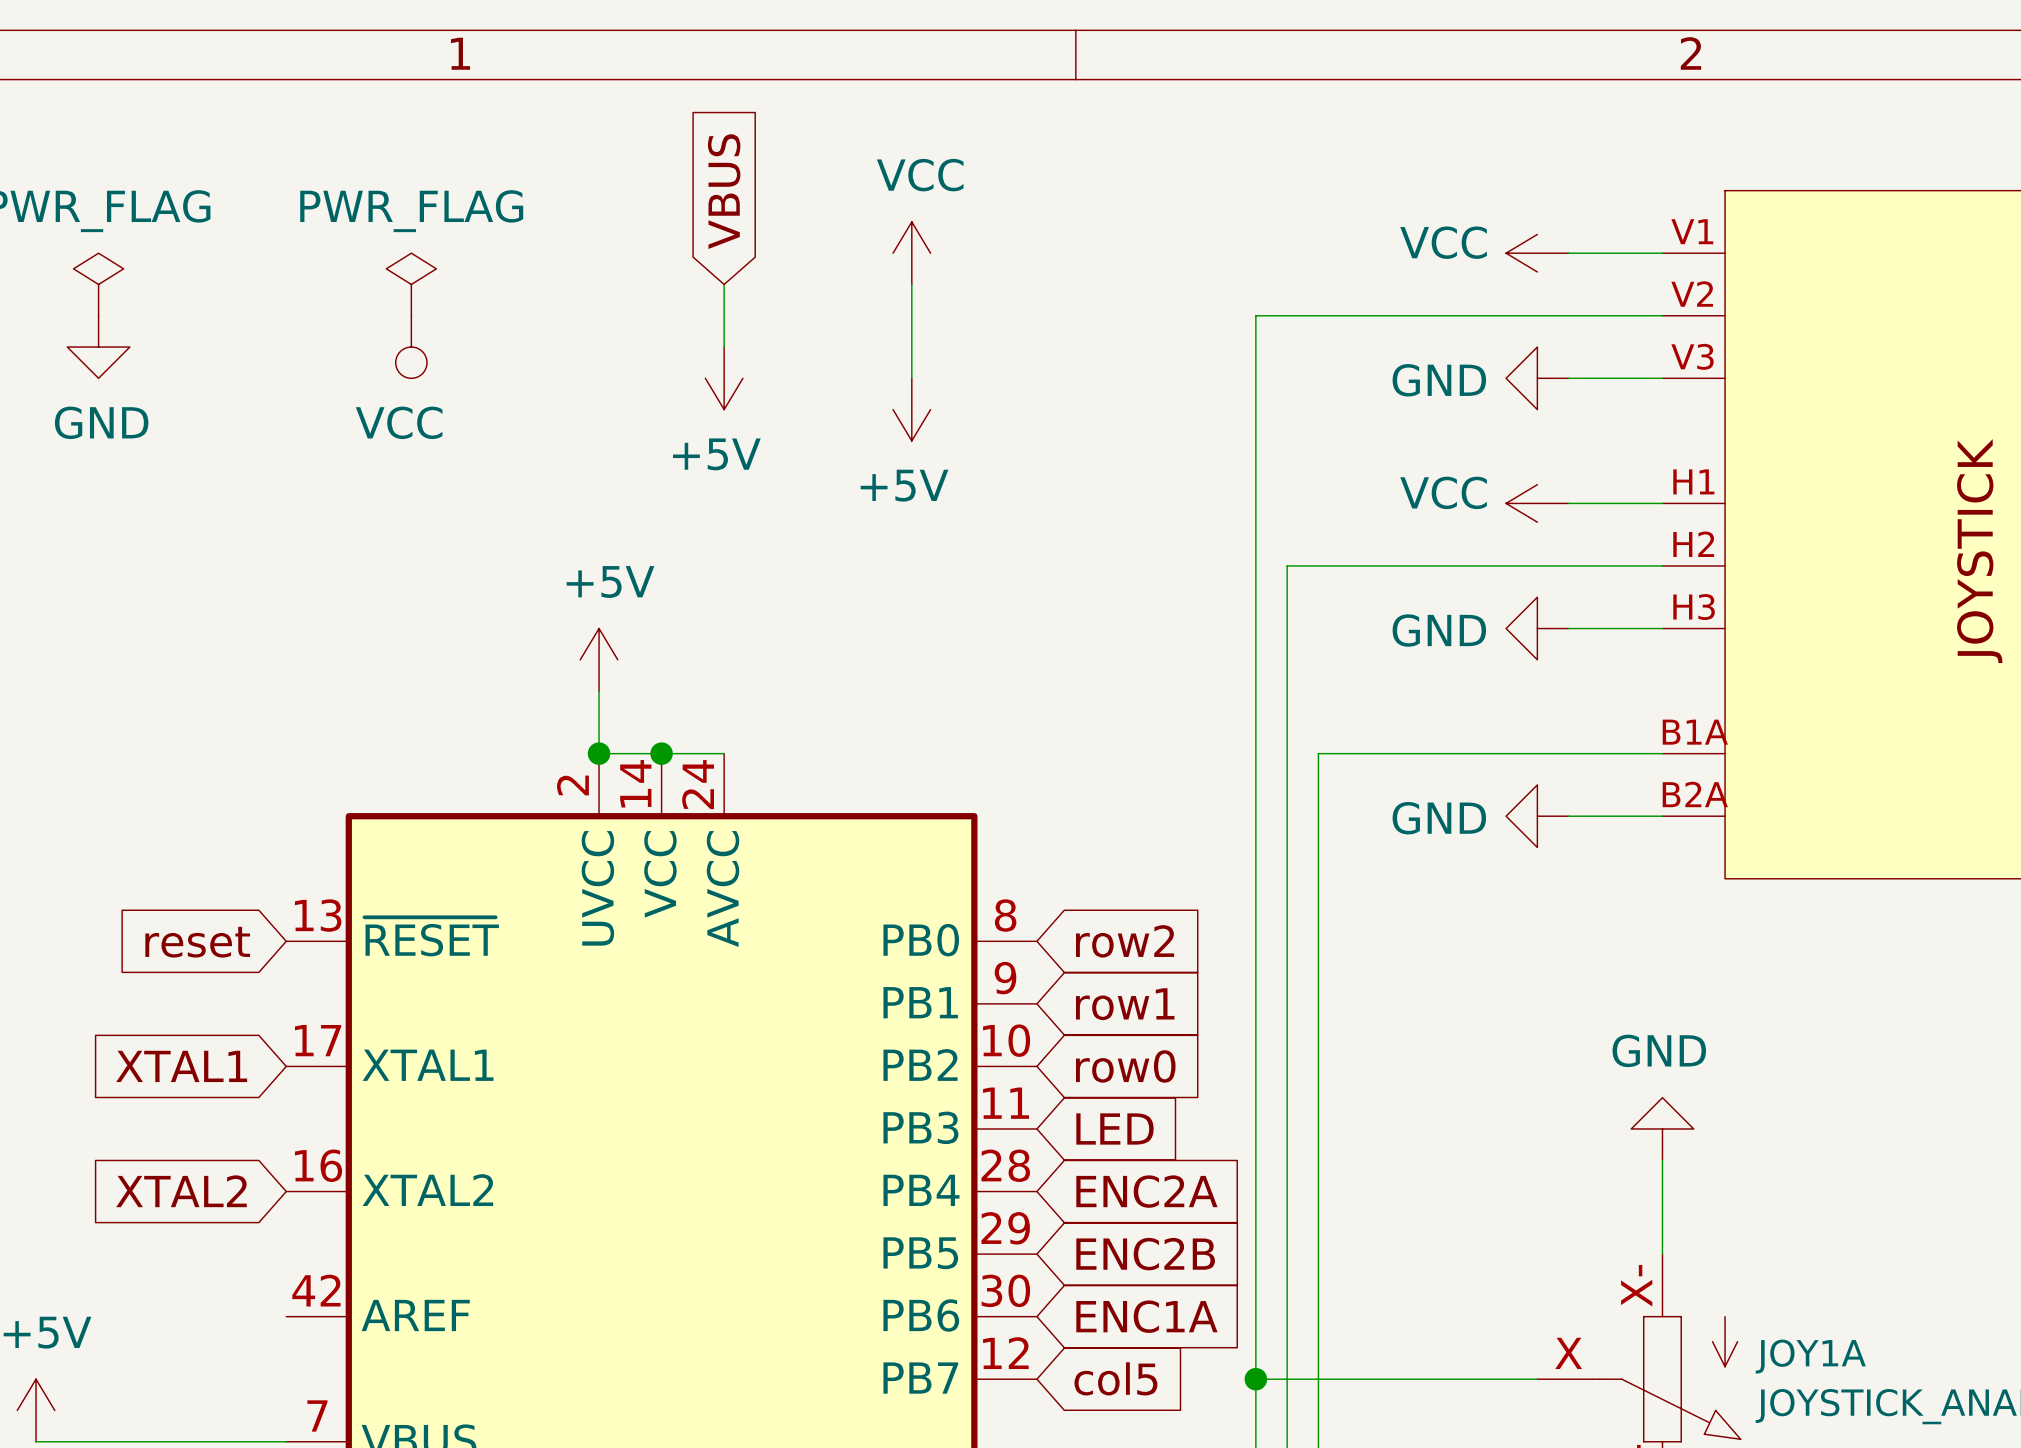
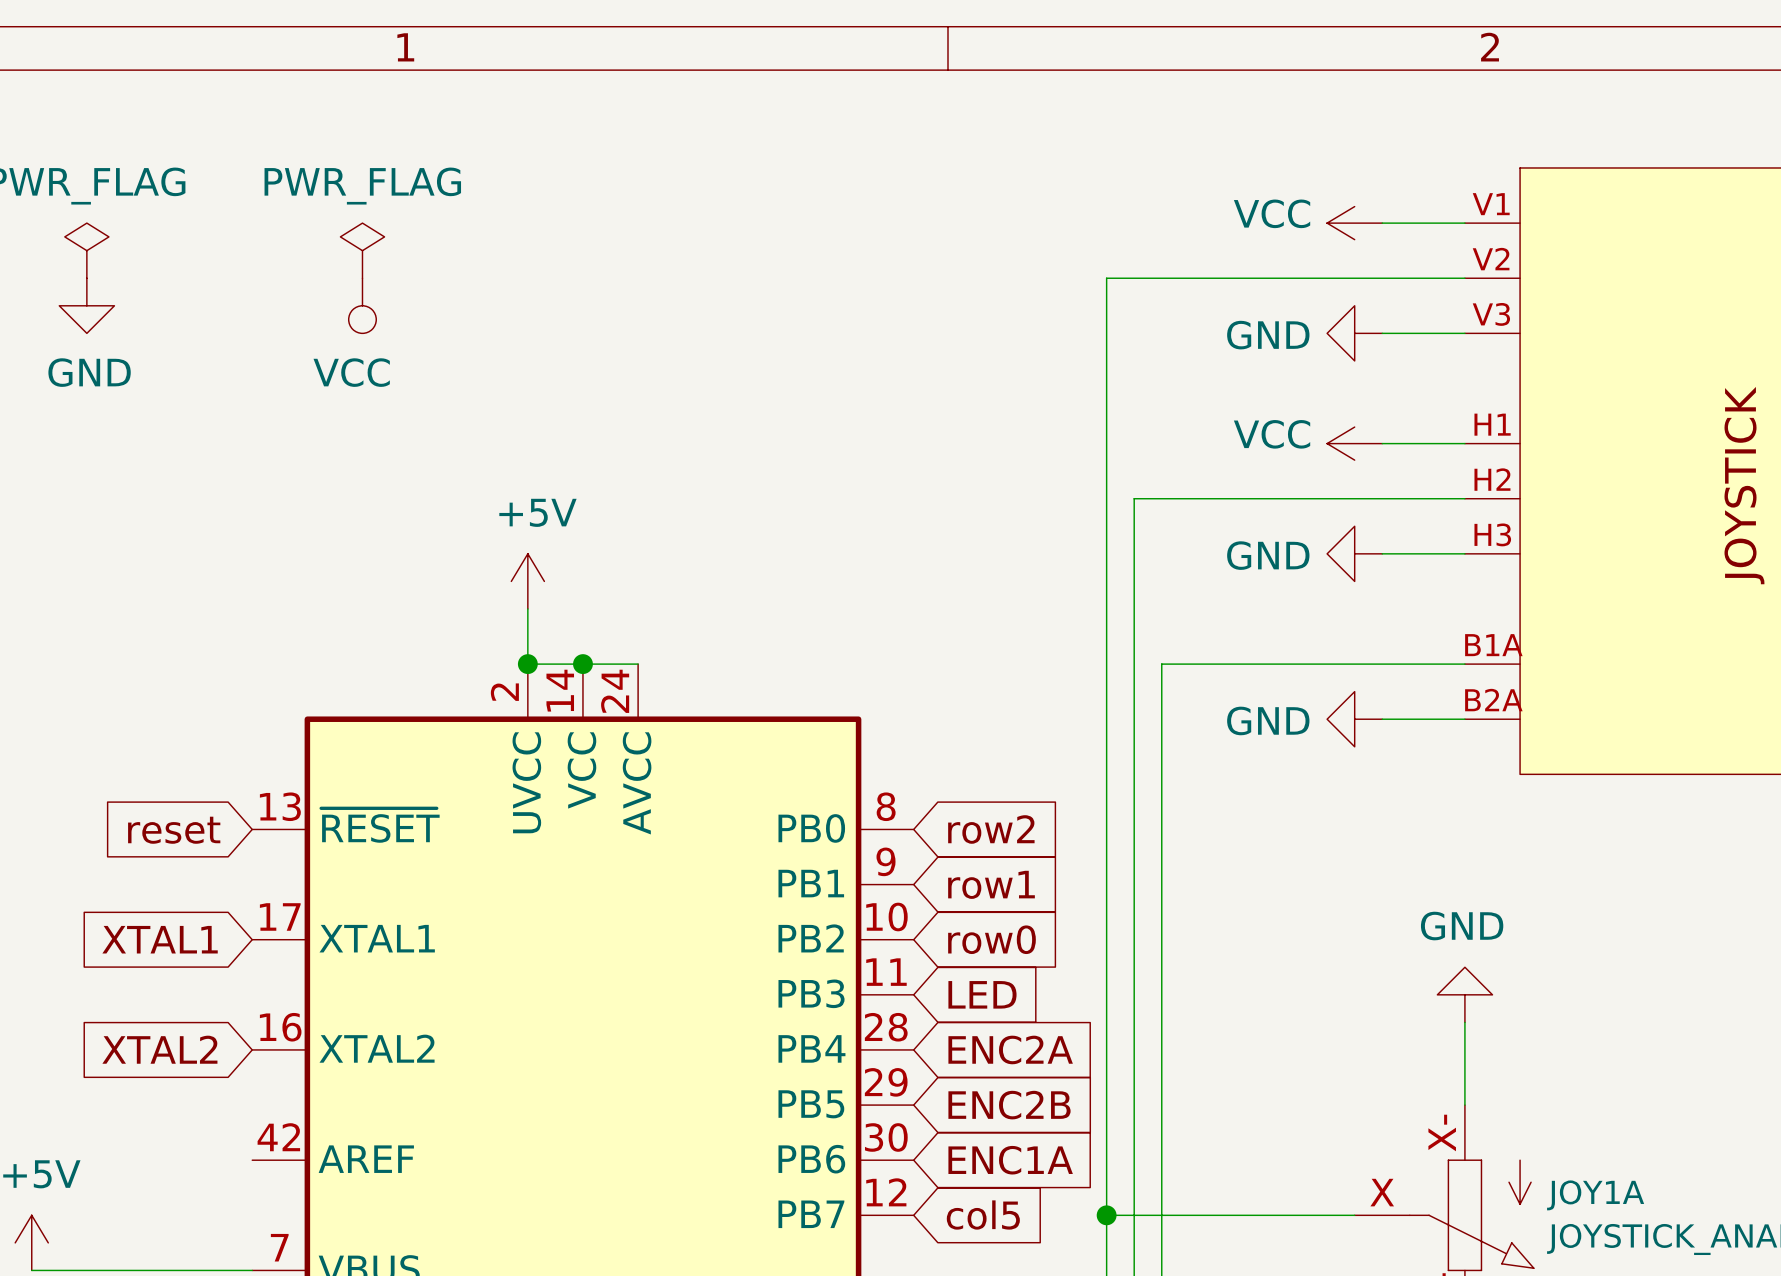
global label: VBUS (724, 191) -> none
power symbol: VCC (911, 253) -> none
wire: (724, 284) (724, 347) -> none
wire: (911, 284) (911, 378) -> none
power symbol: +5V (724, 378) -> none
power symbol: +5V (911, 409) -> none

